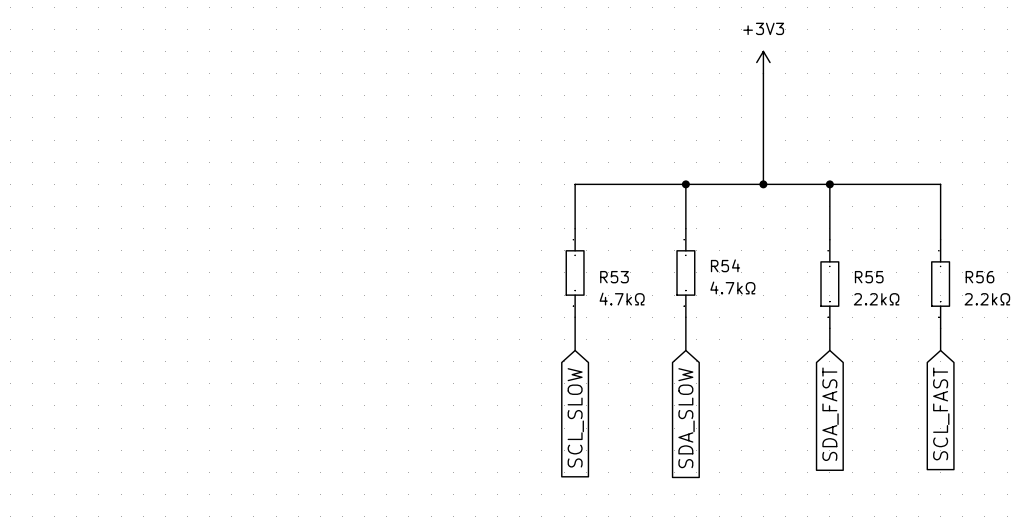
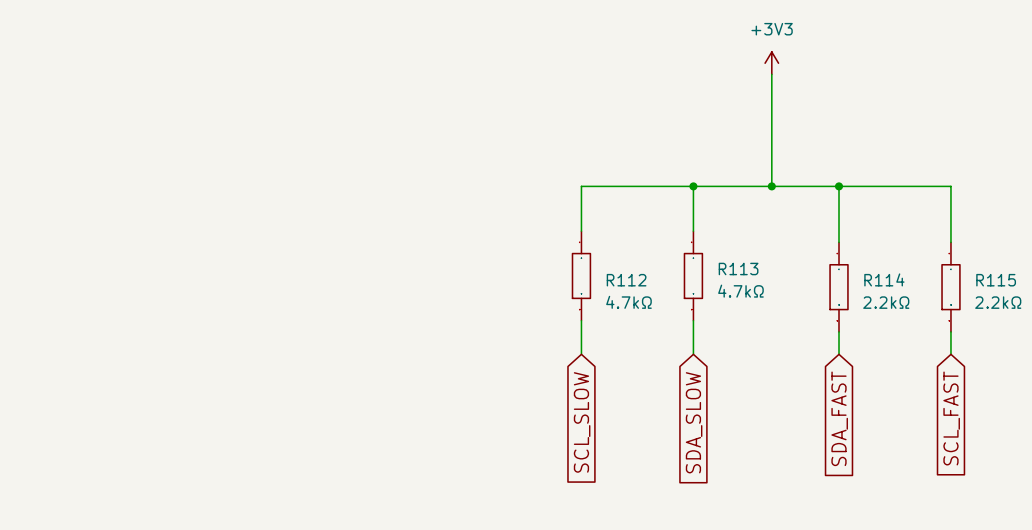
R54 name: R54 (725, 265) -> R113 (738, 269)
R53 name: R53 (614, 277) -> R112 (626, 280)
R55 name: R55 (869, 277) -> R114 (884, 279)
R56 name: R56 (979, 277) -> R115 (996, 280)

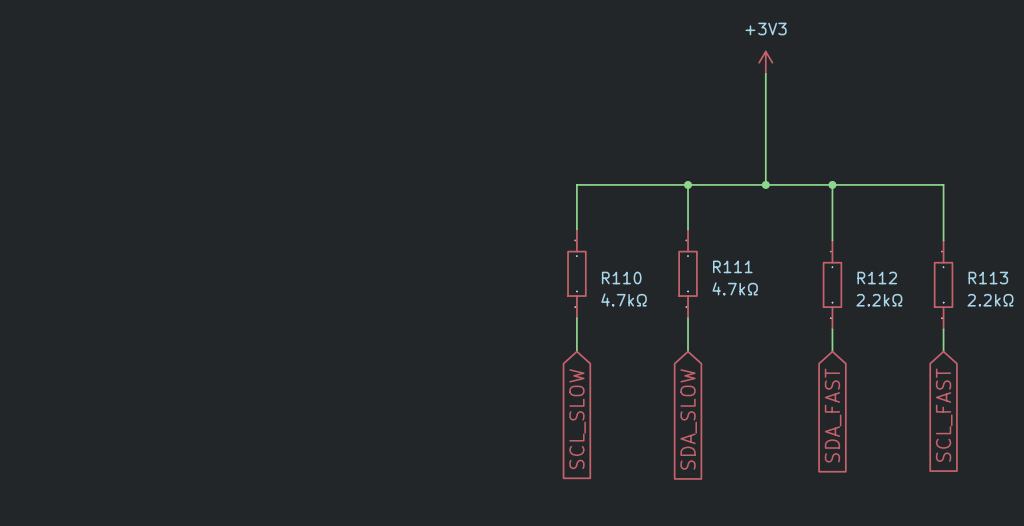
R113 name: R113 (738, 269) -> R111 (732, 266)
R114 name: R114 (884, 279) -> R112 (877, 278)
R112 name: R112 (626, 280) -> R110 (621, 278)
R115 name: R115 (996, 280) -> R113 (988, 278)

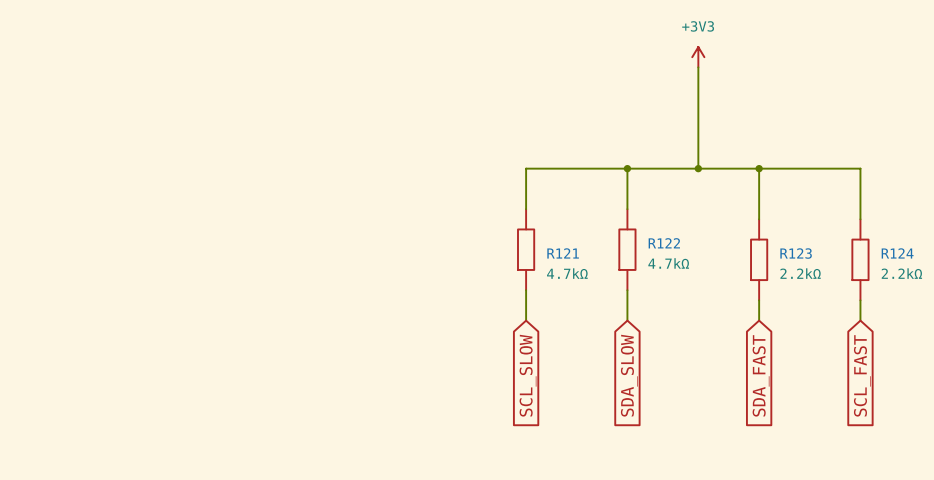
R111 name: R111 (732, 266) -> R122 (664, 243)
R110 name: R110 (621, 278) -> R121 (563, 253)
R112 name: R112 (877, 278) -> R123 (796, 253)
R113 name: R113 (988, 278) -> R124 (897, 253)

